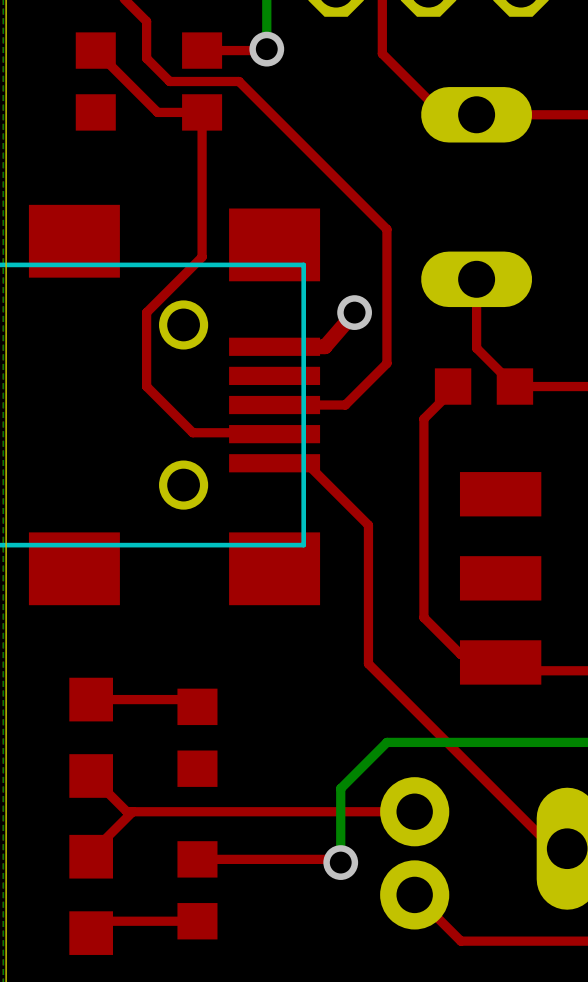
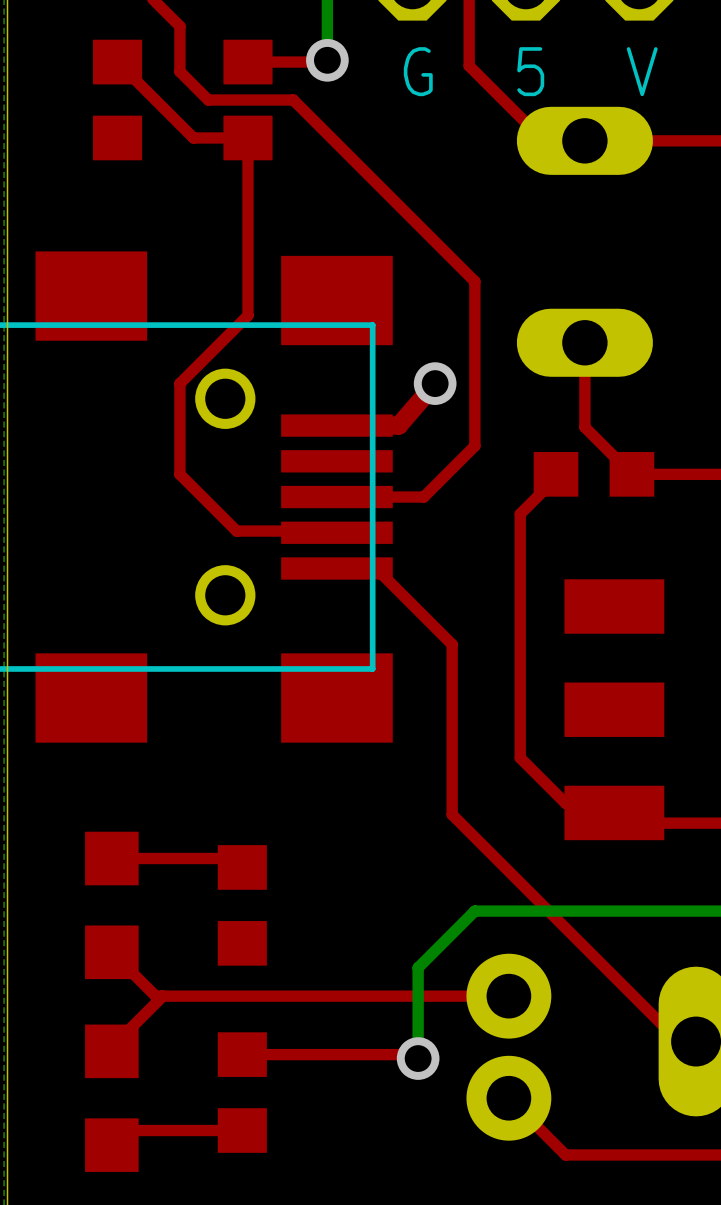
text: none -> G (418, 71)
text: none -> 5 (530, 71)
text: none -> V (642, 71)

